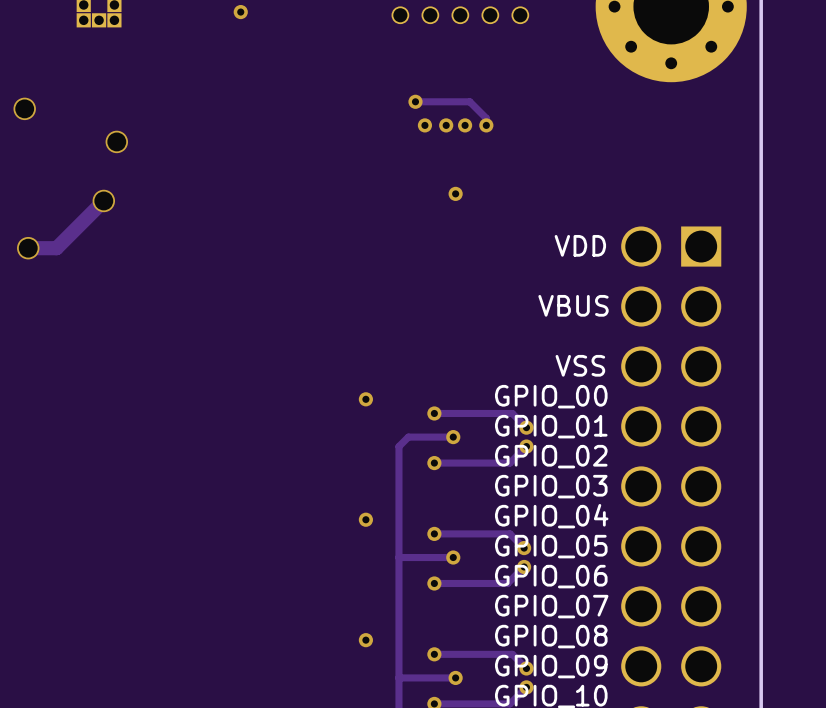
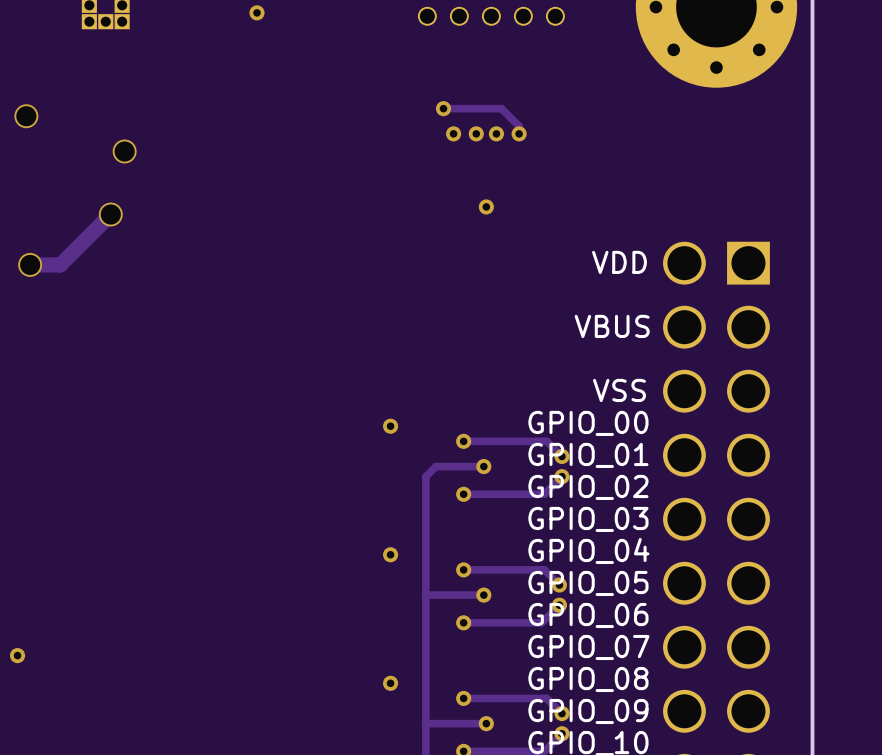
via: none -> (17, 655)

